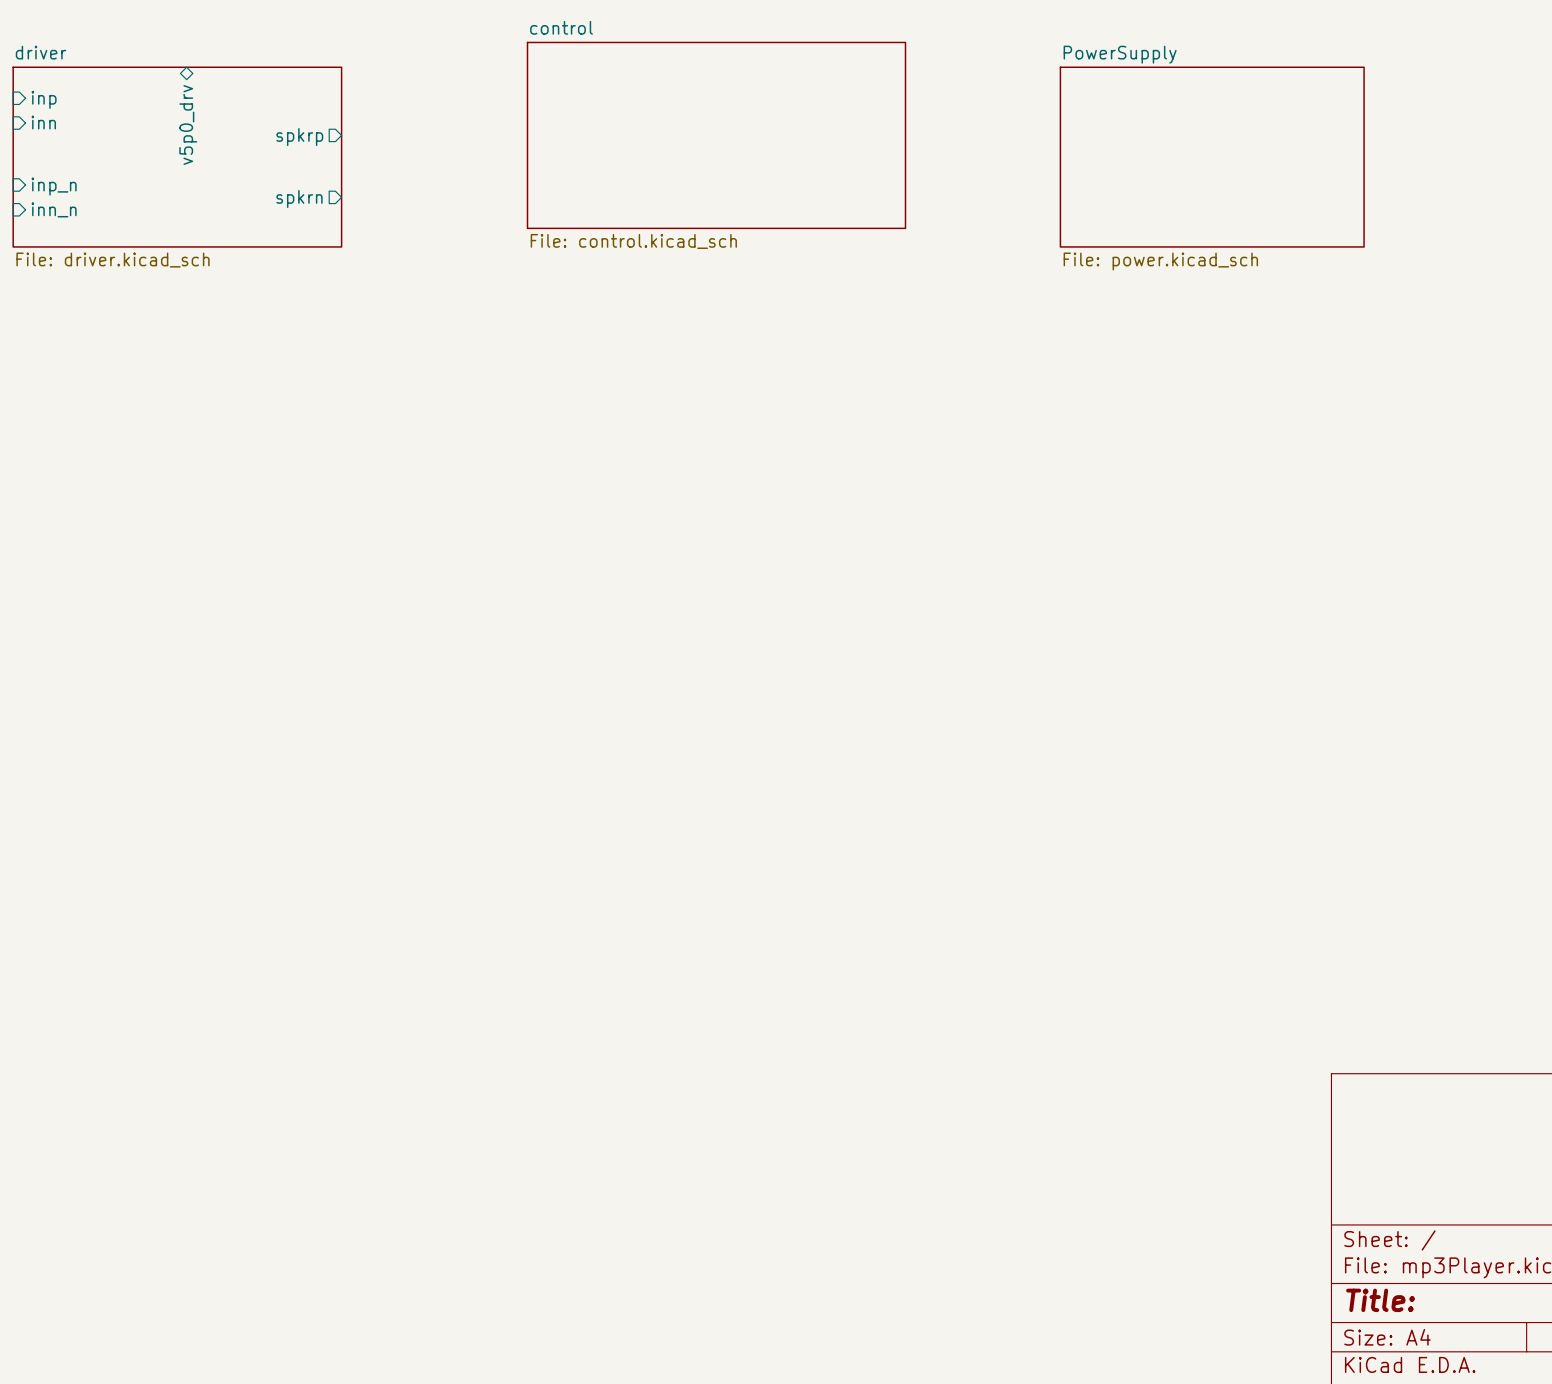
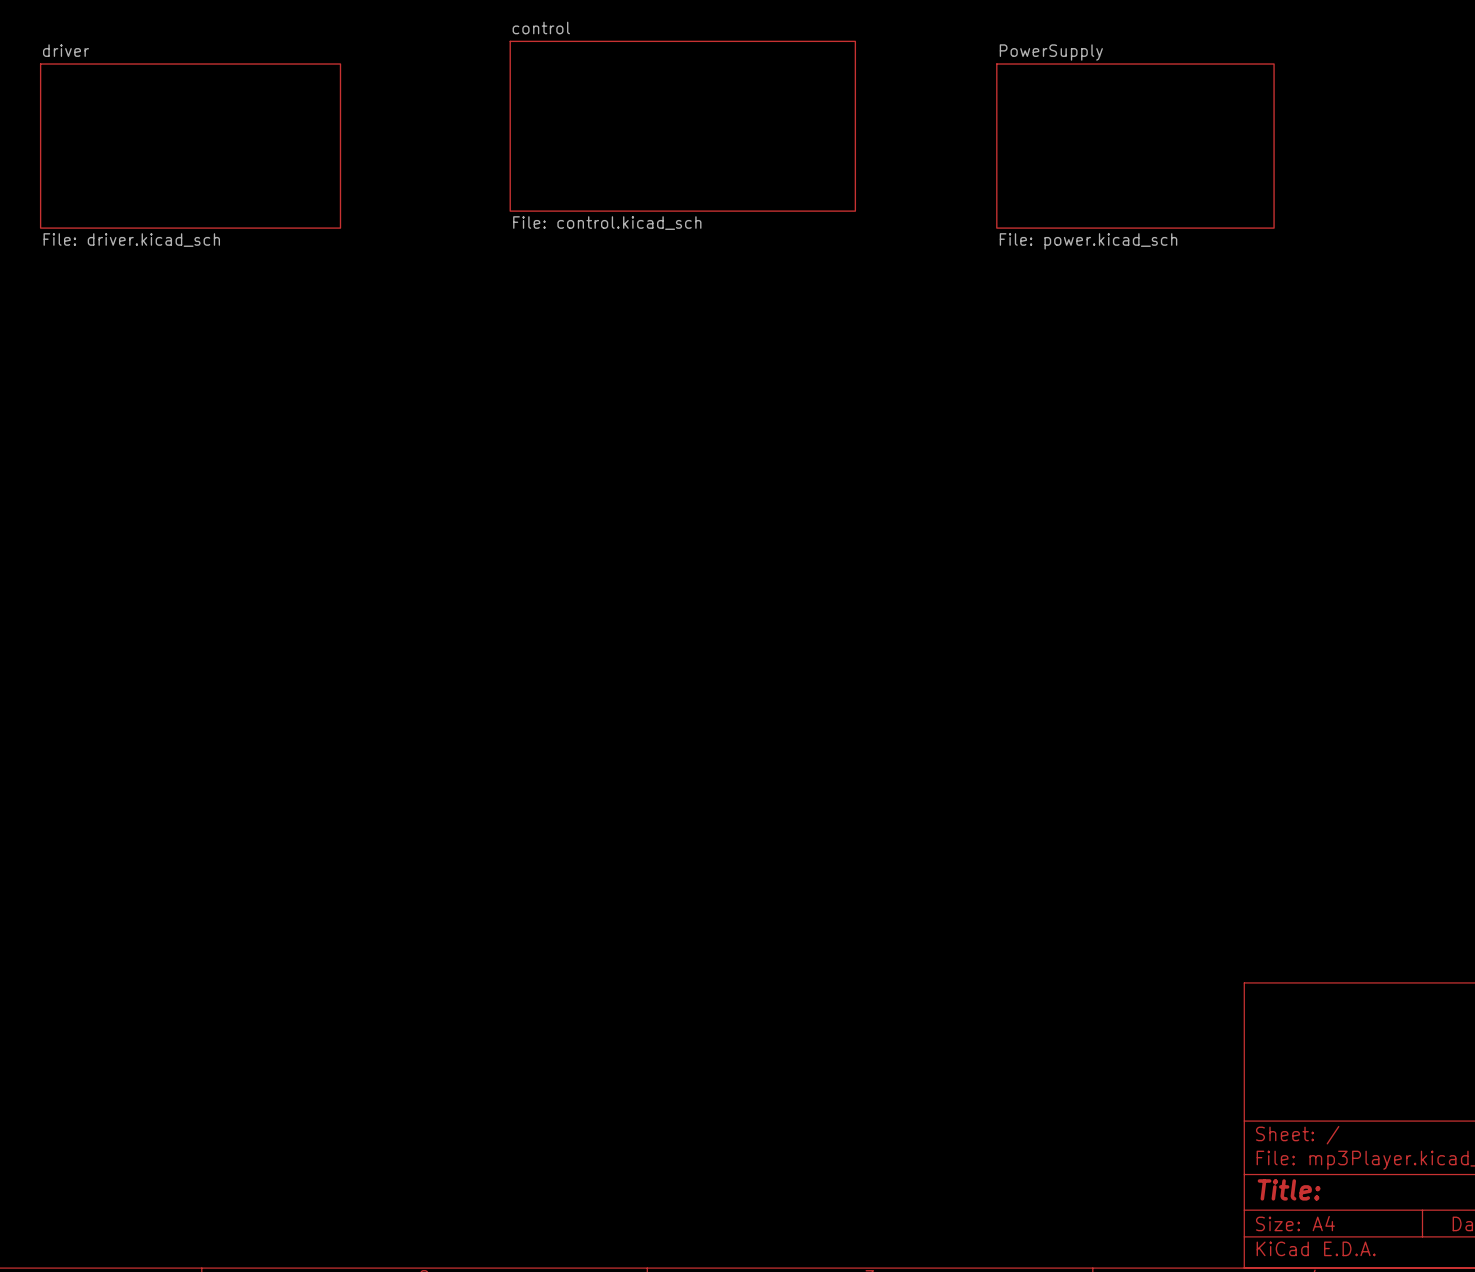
sheet pin: inp (44, 99) -> none
sheet pin: inn (43, 122) -> none
sheet pin: v5p0_drv (188, 124) -> none
sheet pin: spkrp (299, 137) -> none
sheet pin: inp_n (54, 186) -> none
sheet pin: spkrn (299, 198) -> none
sheet pin: inn_n (54, 209) -> none

